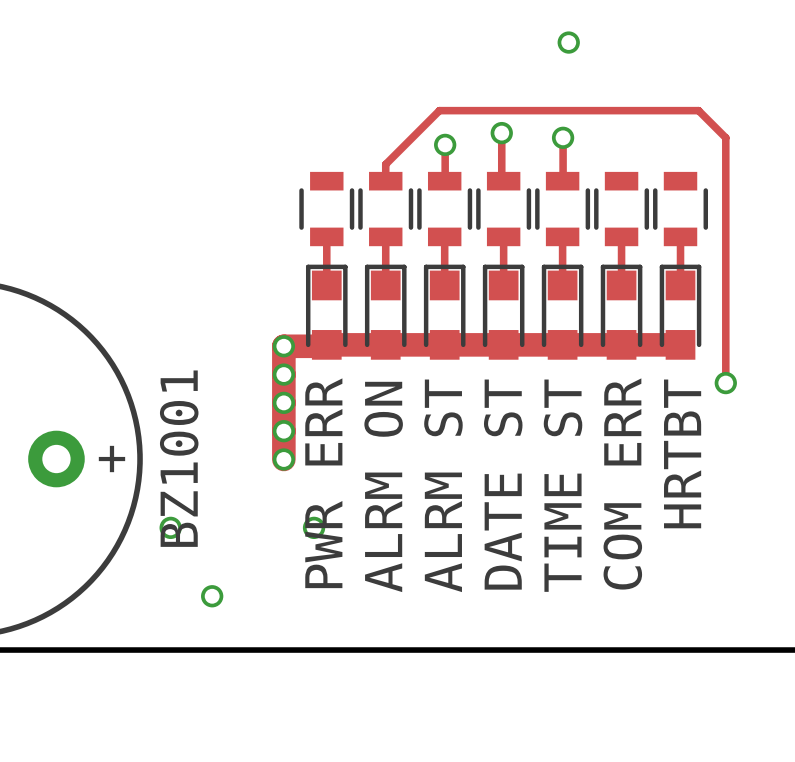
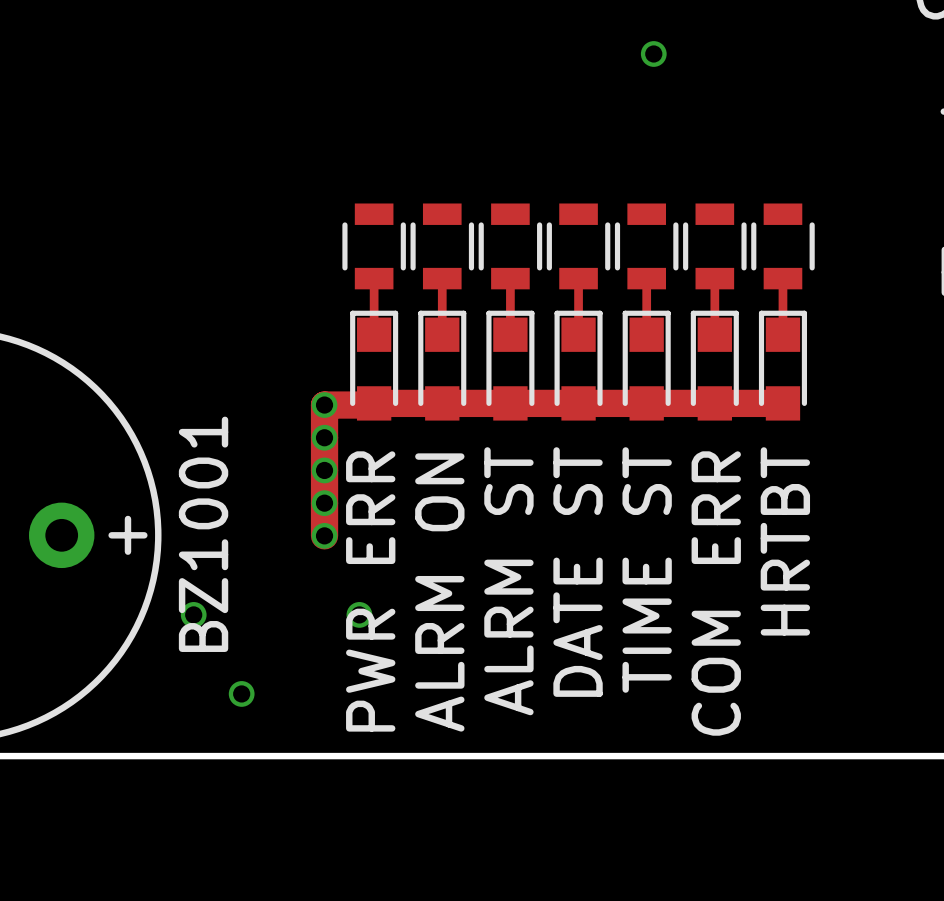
track: (501, 133) (501, 179) (503, 181) -> none
via: (501, 133) -> none
track: (563, 137) (563, 180) -> none
via: (563, 137) -> none
track: (445, 144) (445, 180) -> none
via: (445, 144) -> none
track: (385, 181) (385, 164) (439, 110) (698, 110) (725, 137) (725, 383) -> none
via: (725, 383) -> none

